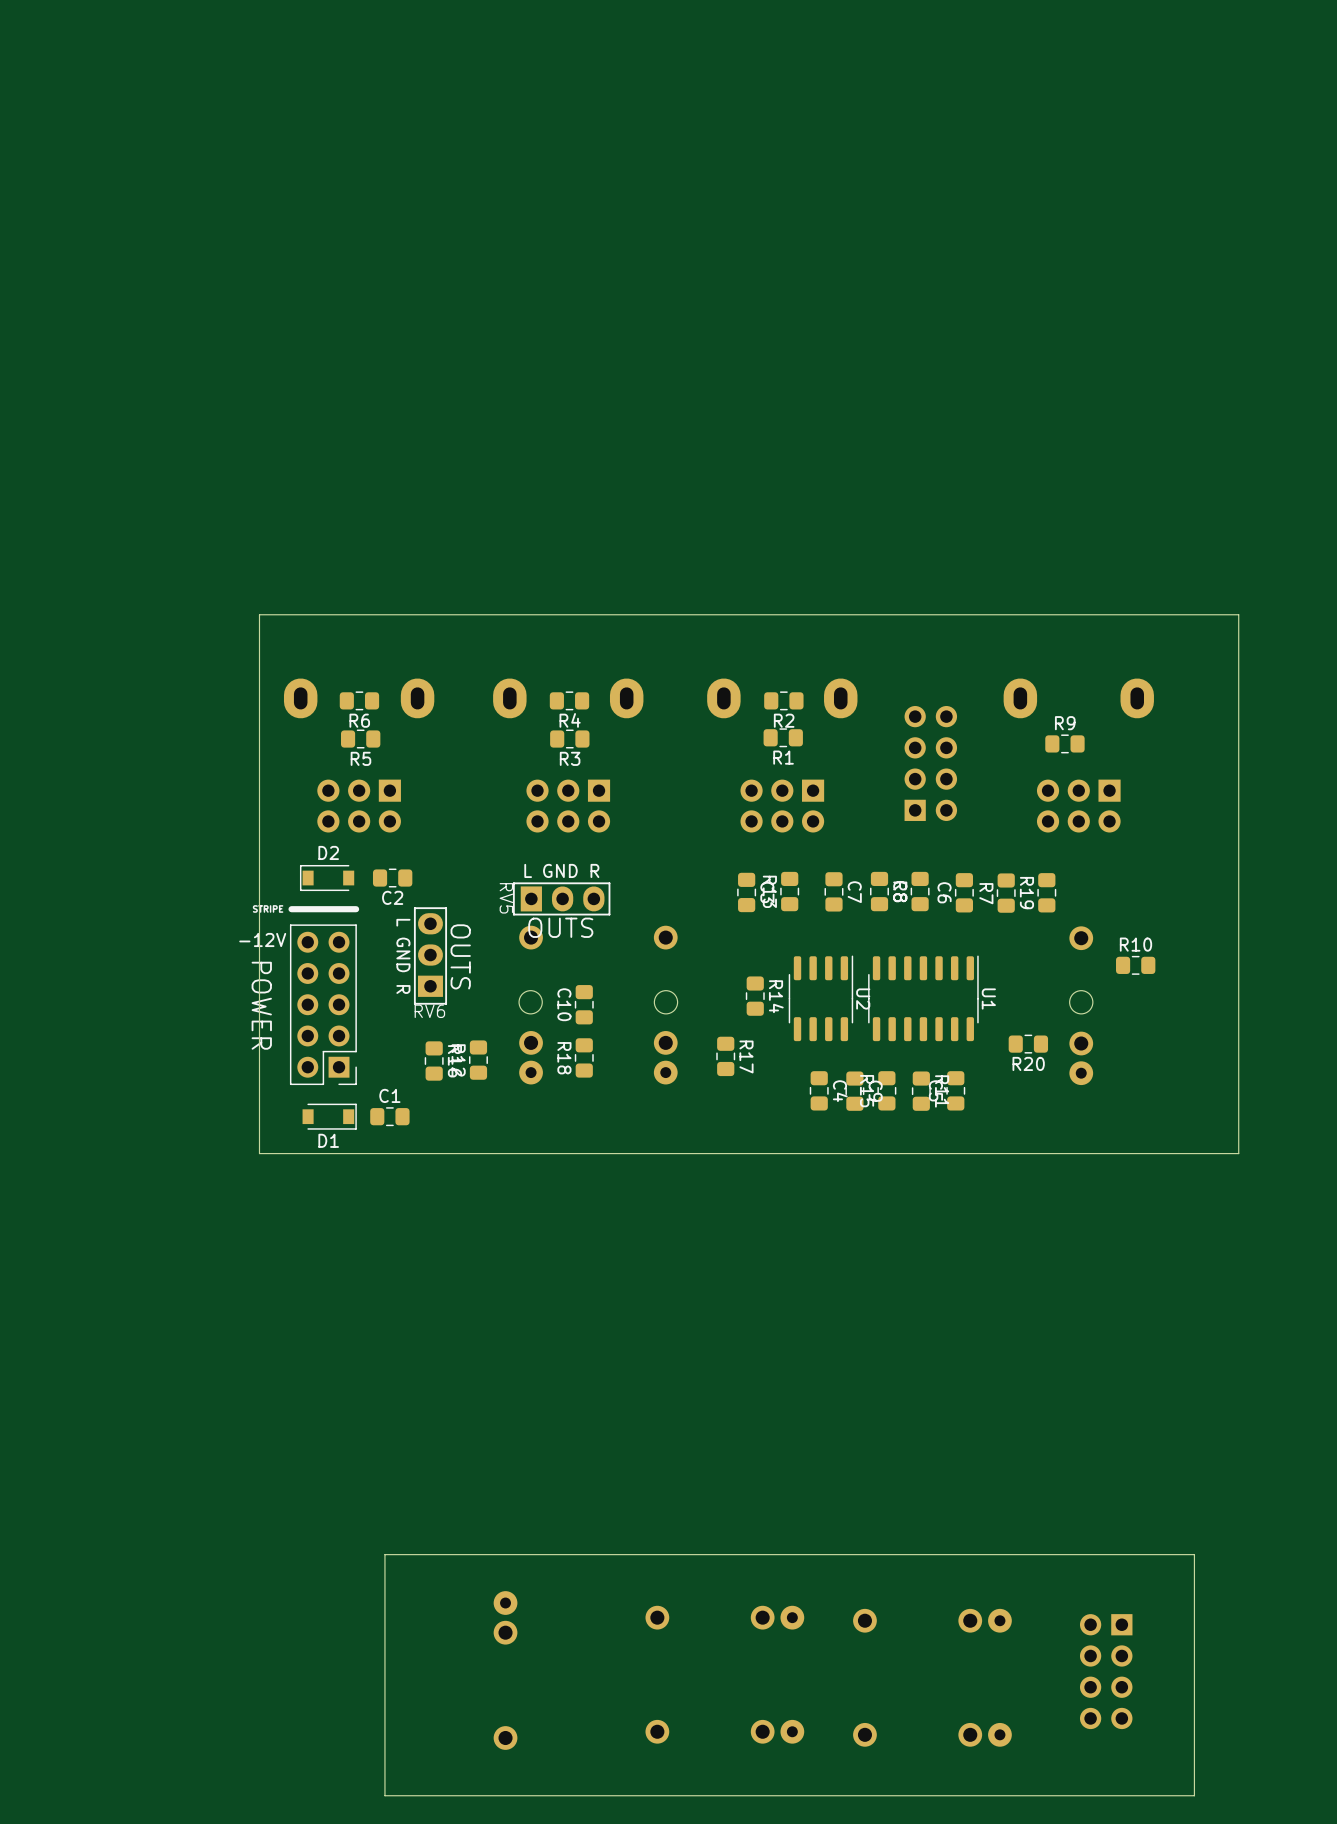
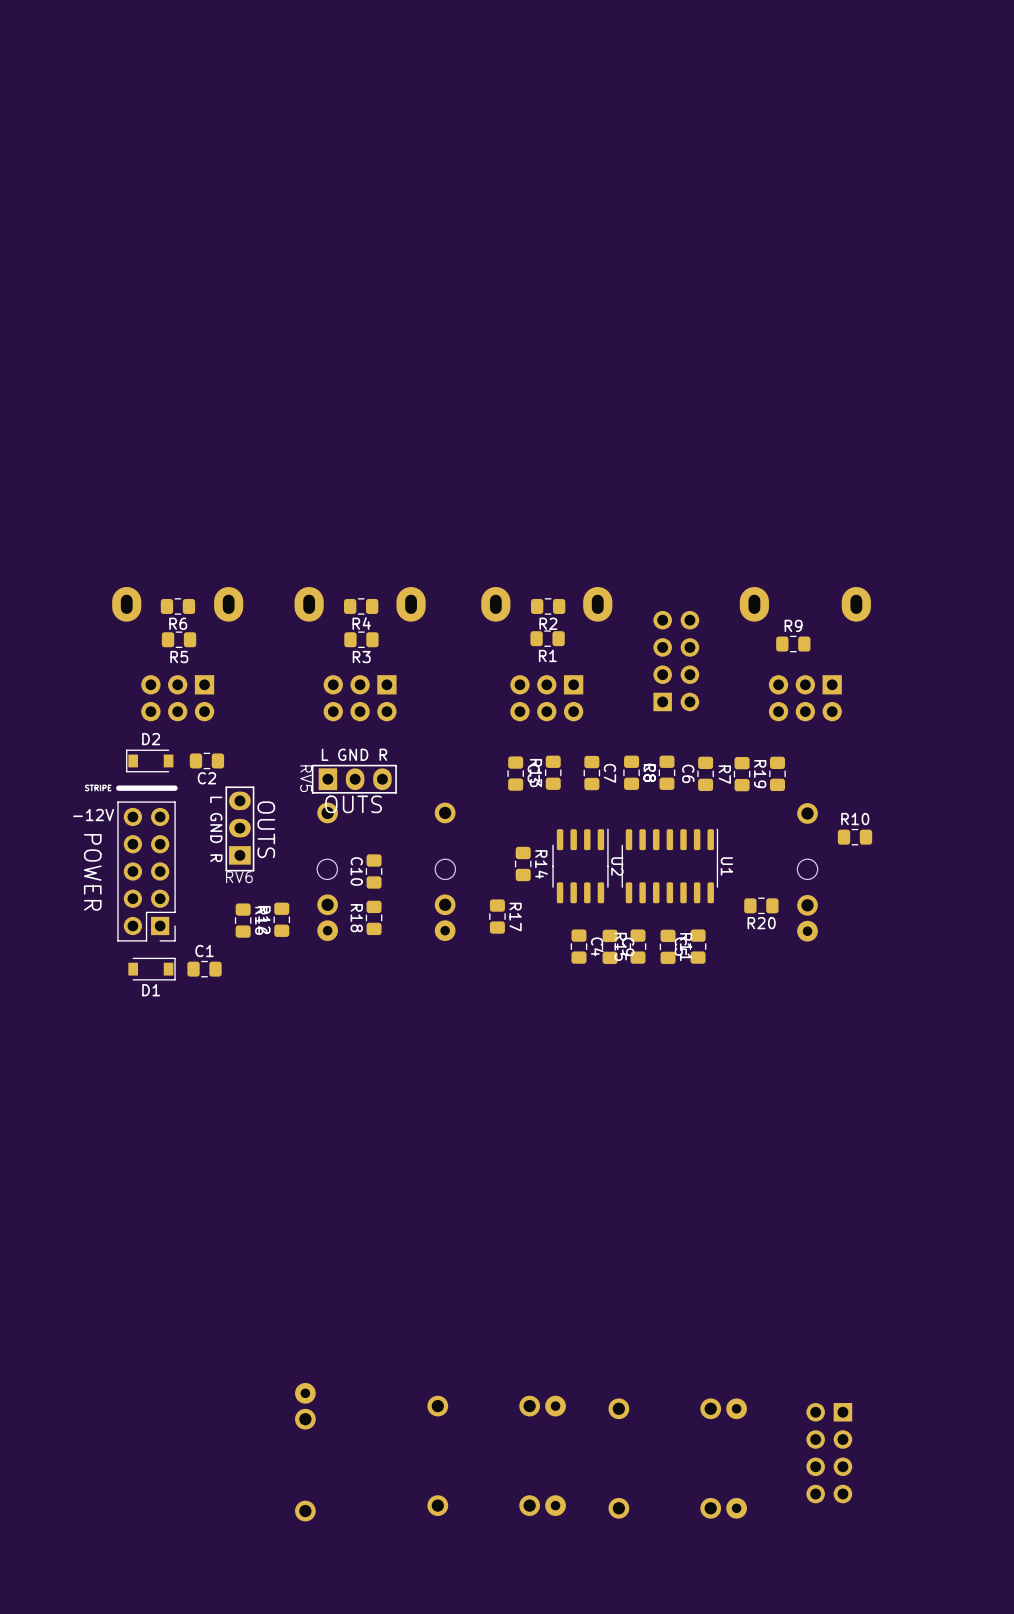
board edge: (1238, 614) (1238, 1153) (259, 1153) (259, 614) (1238, 614) -> none
board edge: (1194, 1554) (1194, 1795) (384, 1795) (384, 1554) (1194, 1554) -> none

